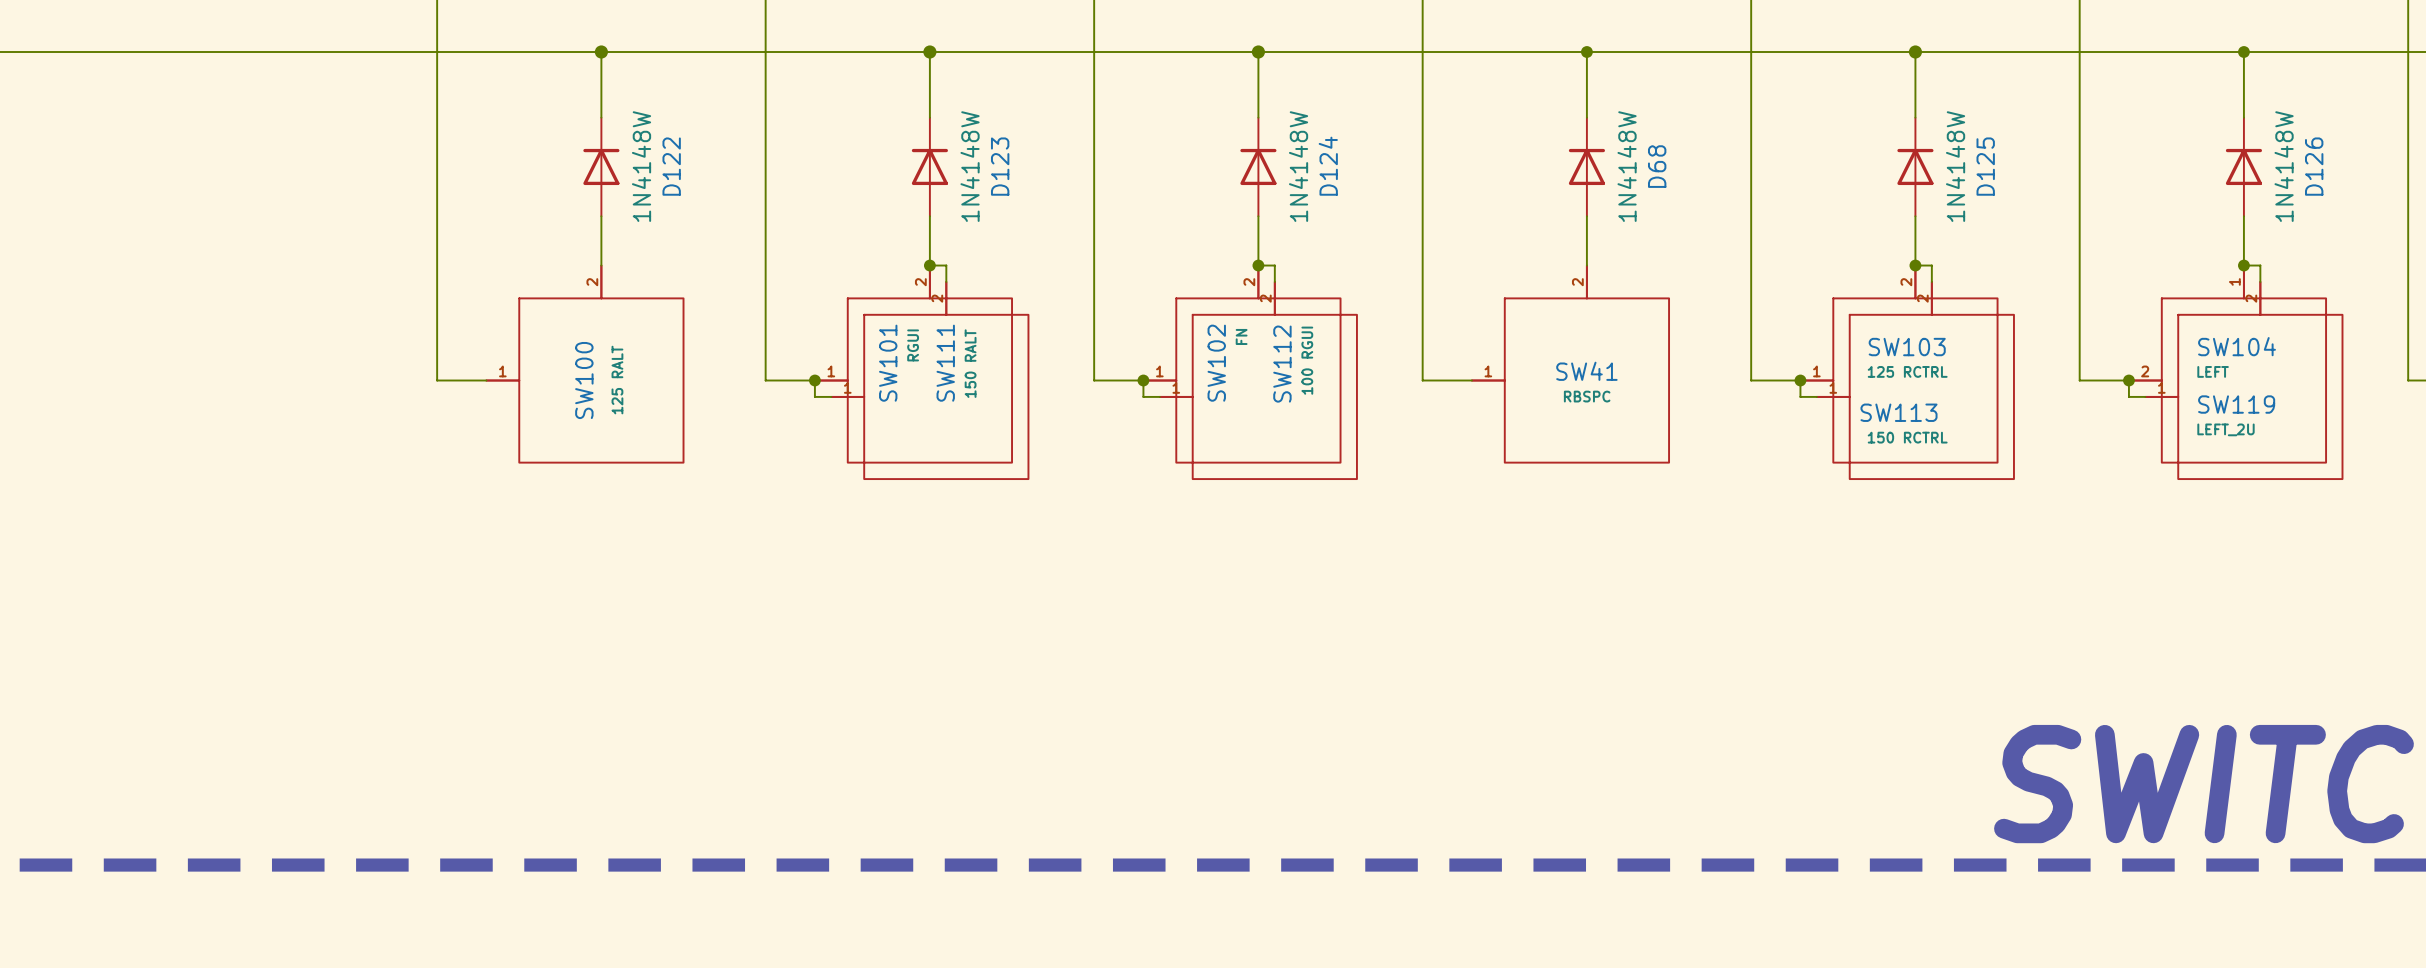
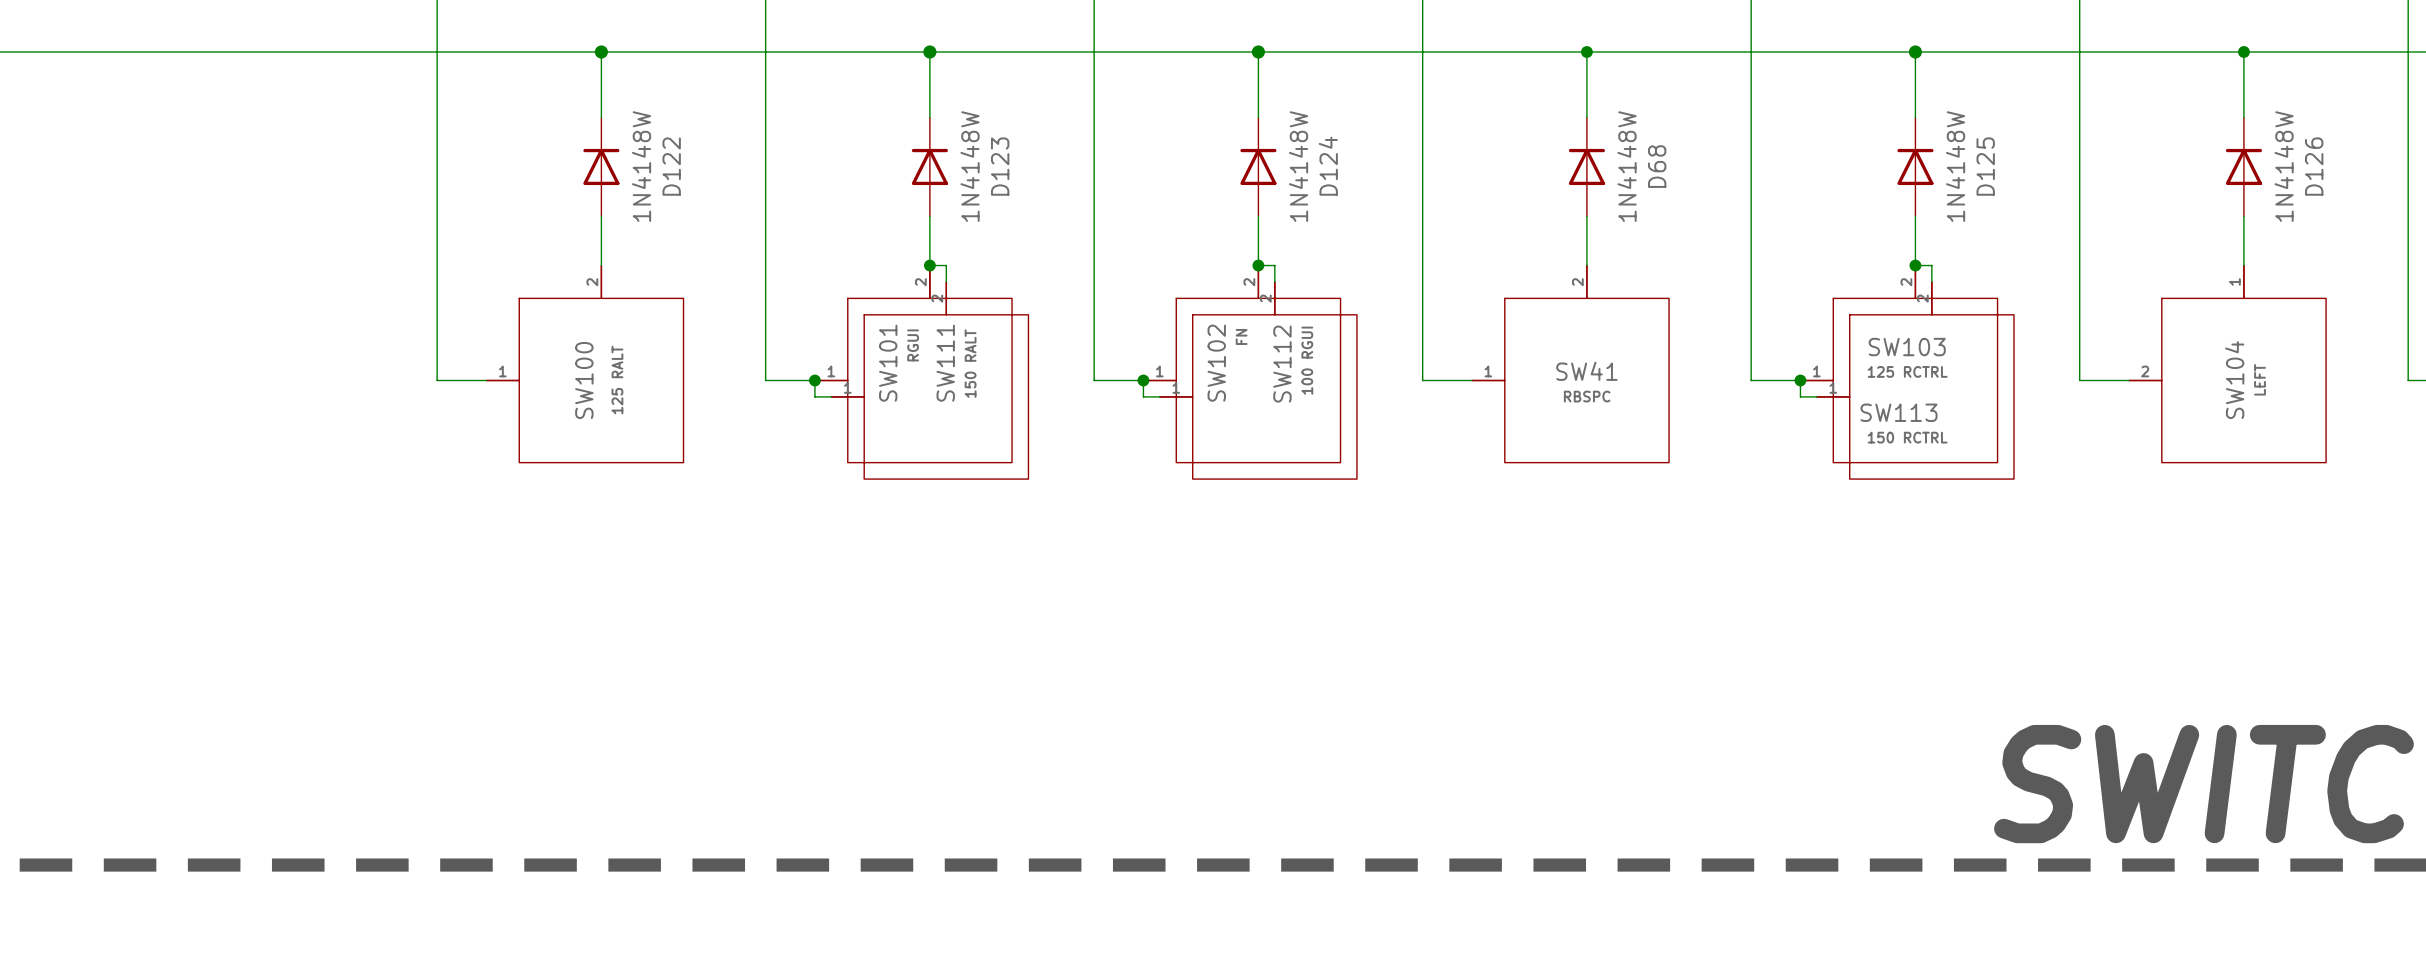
wire: (2243, 265) (2260, 265) (2260, 281) -> none
junction: (2243, 265) -> none
SW104 name rotation: 0° (2237, 346) -> 90° counterclockwise (2234, 380)
SW104 text rotation: 0° (2213, 371) -> 90° counterclockwise (2259, 379)
SW104 text position: LEFT (2213, 371) -> LEFT (2259, 379)
wire: (2128, 380) (2128, 396) (2145, 396) -> none
junction: (2128, 380) -> none
SW119: (2243, 380) -> none

